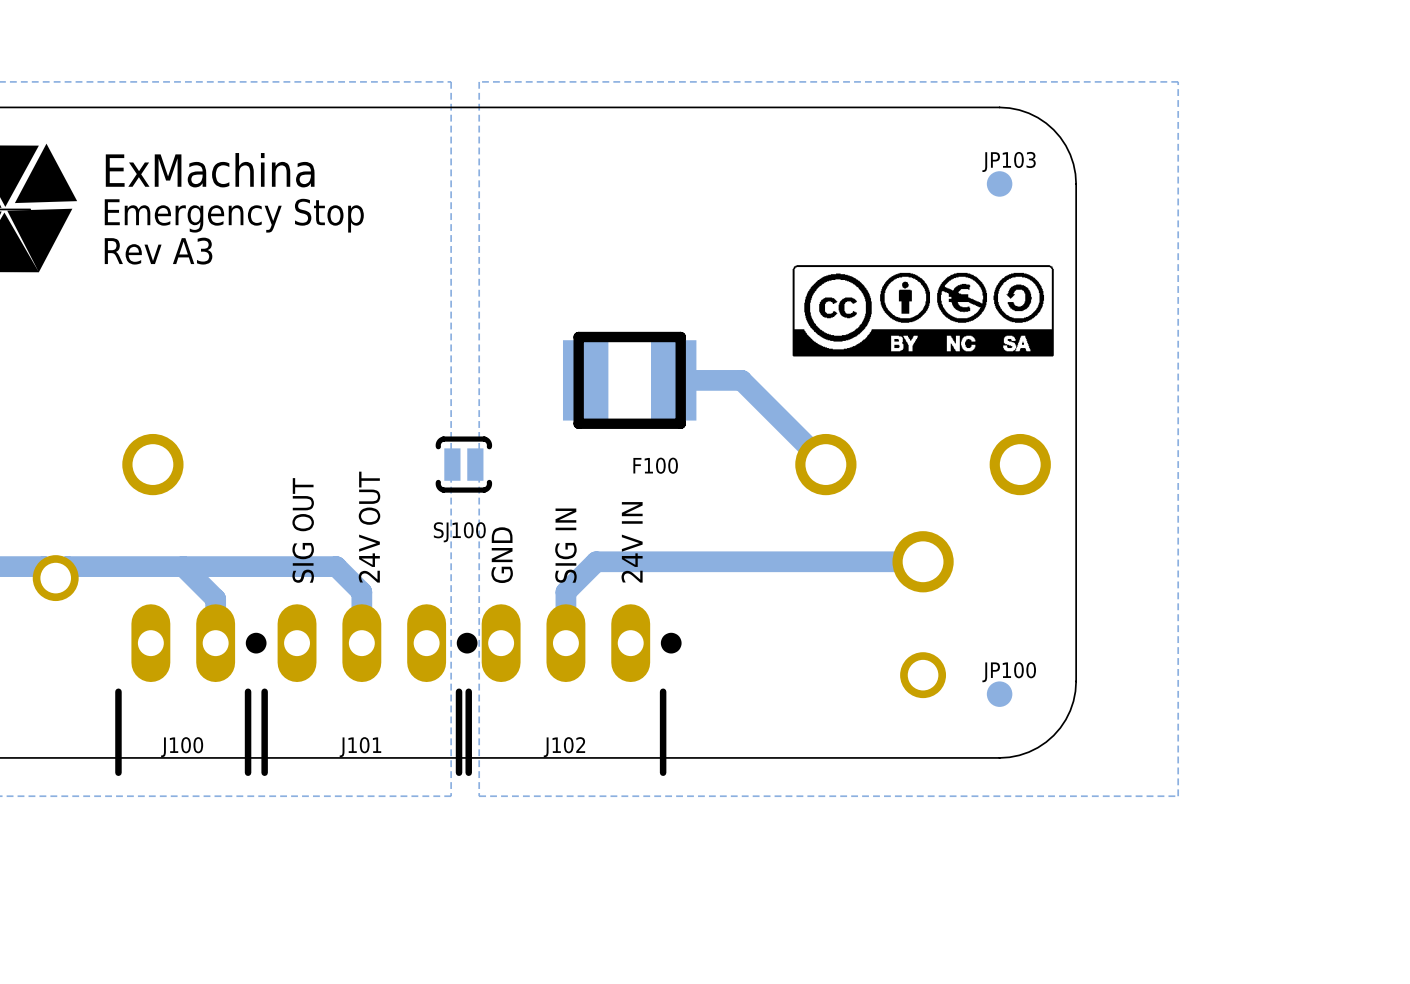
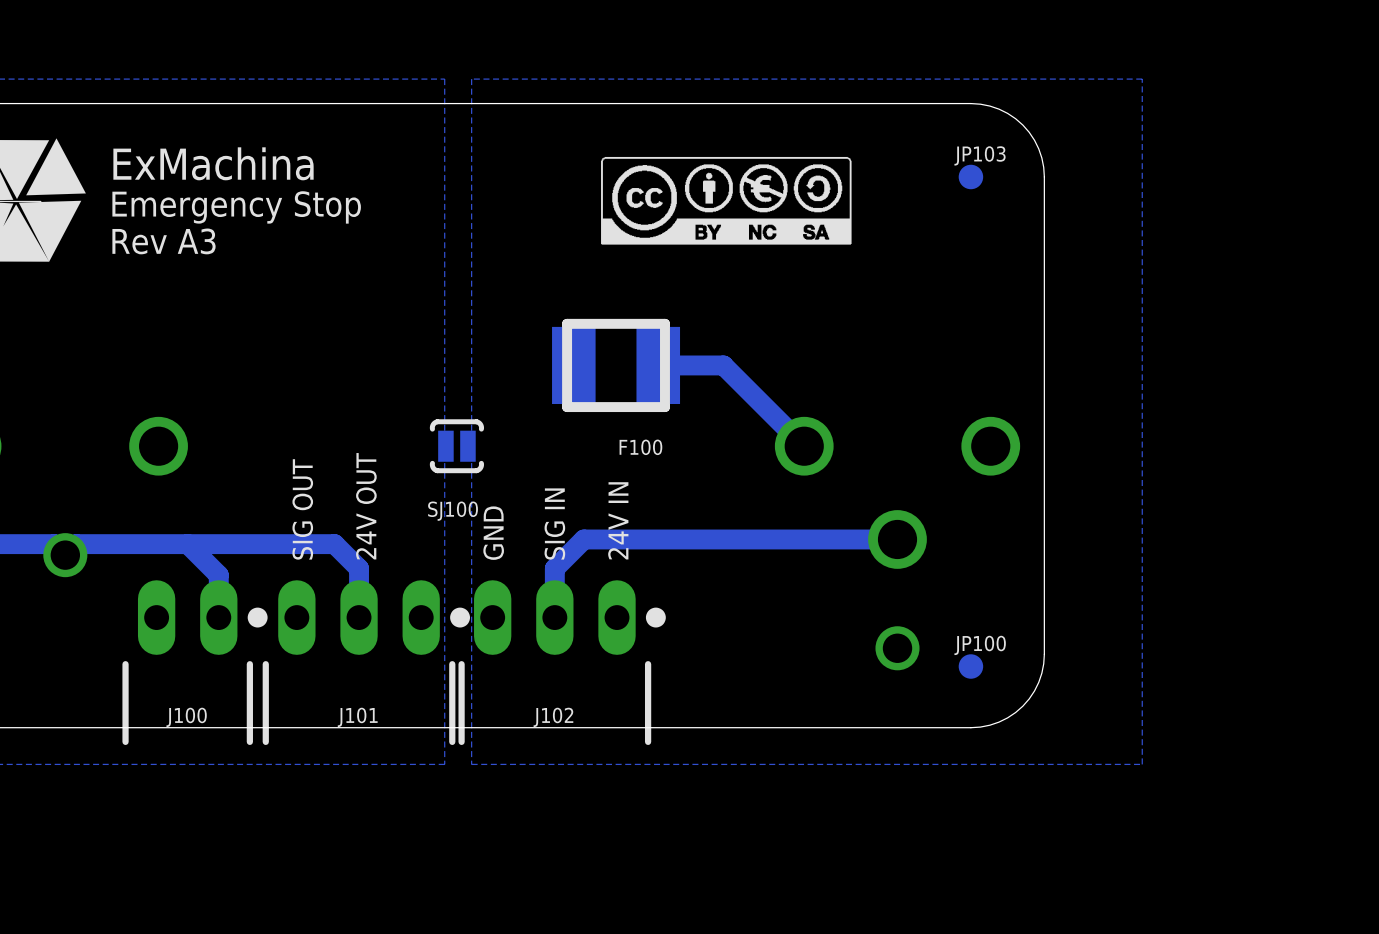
drawing position: (923, 310) -> (726, 200)

